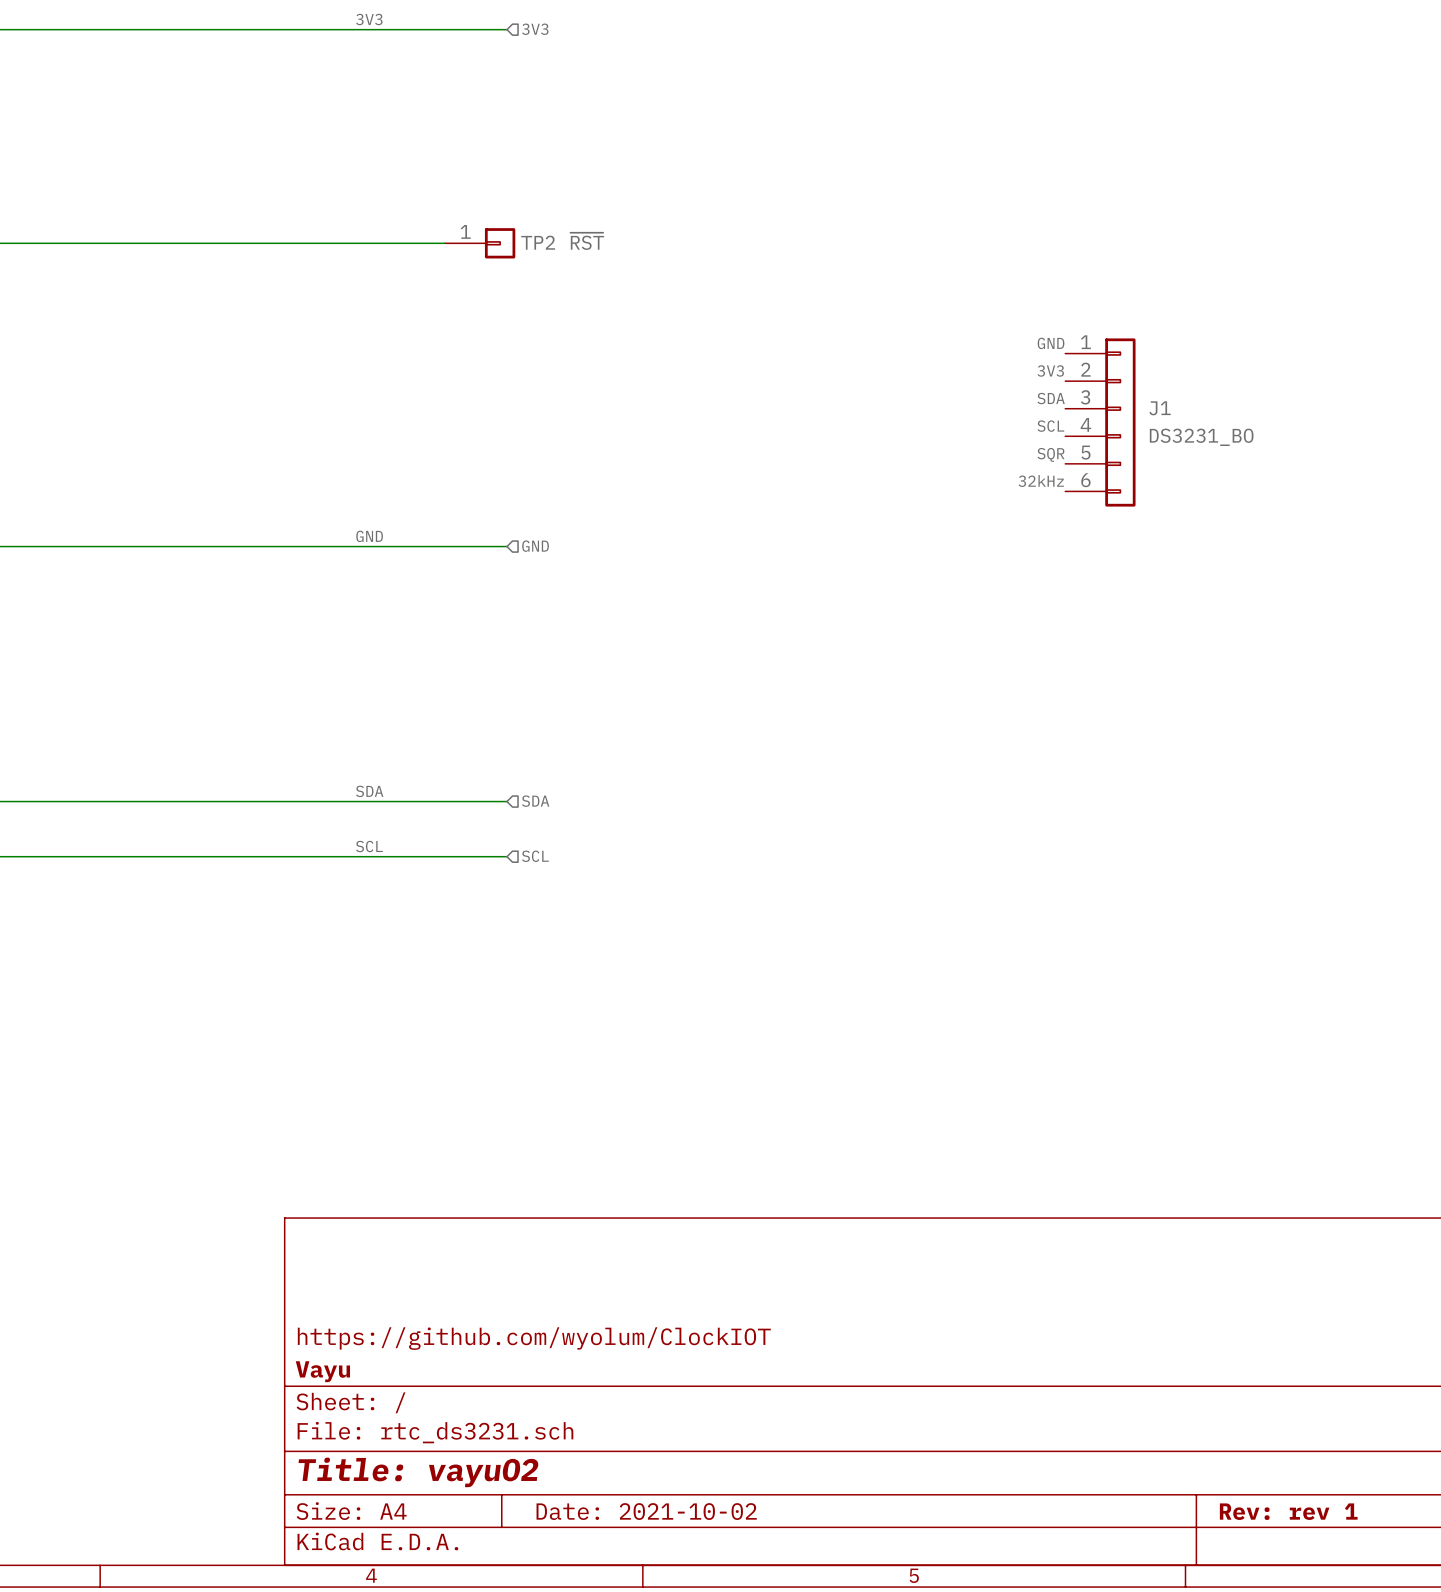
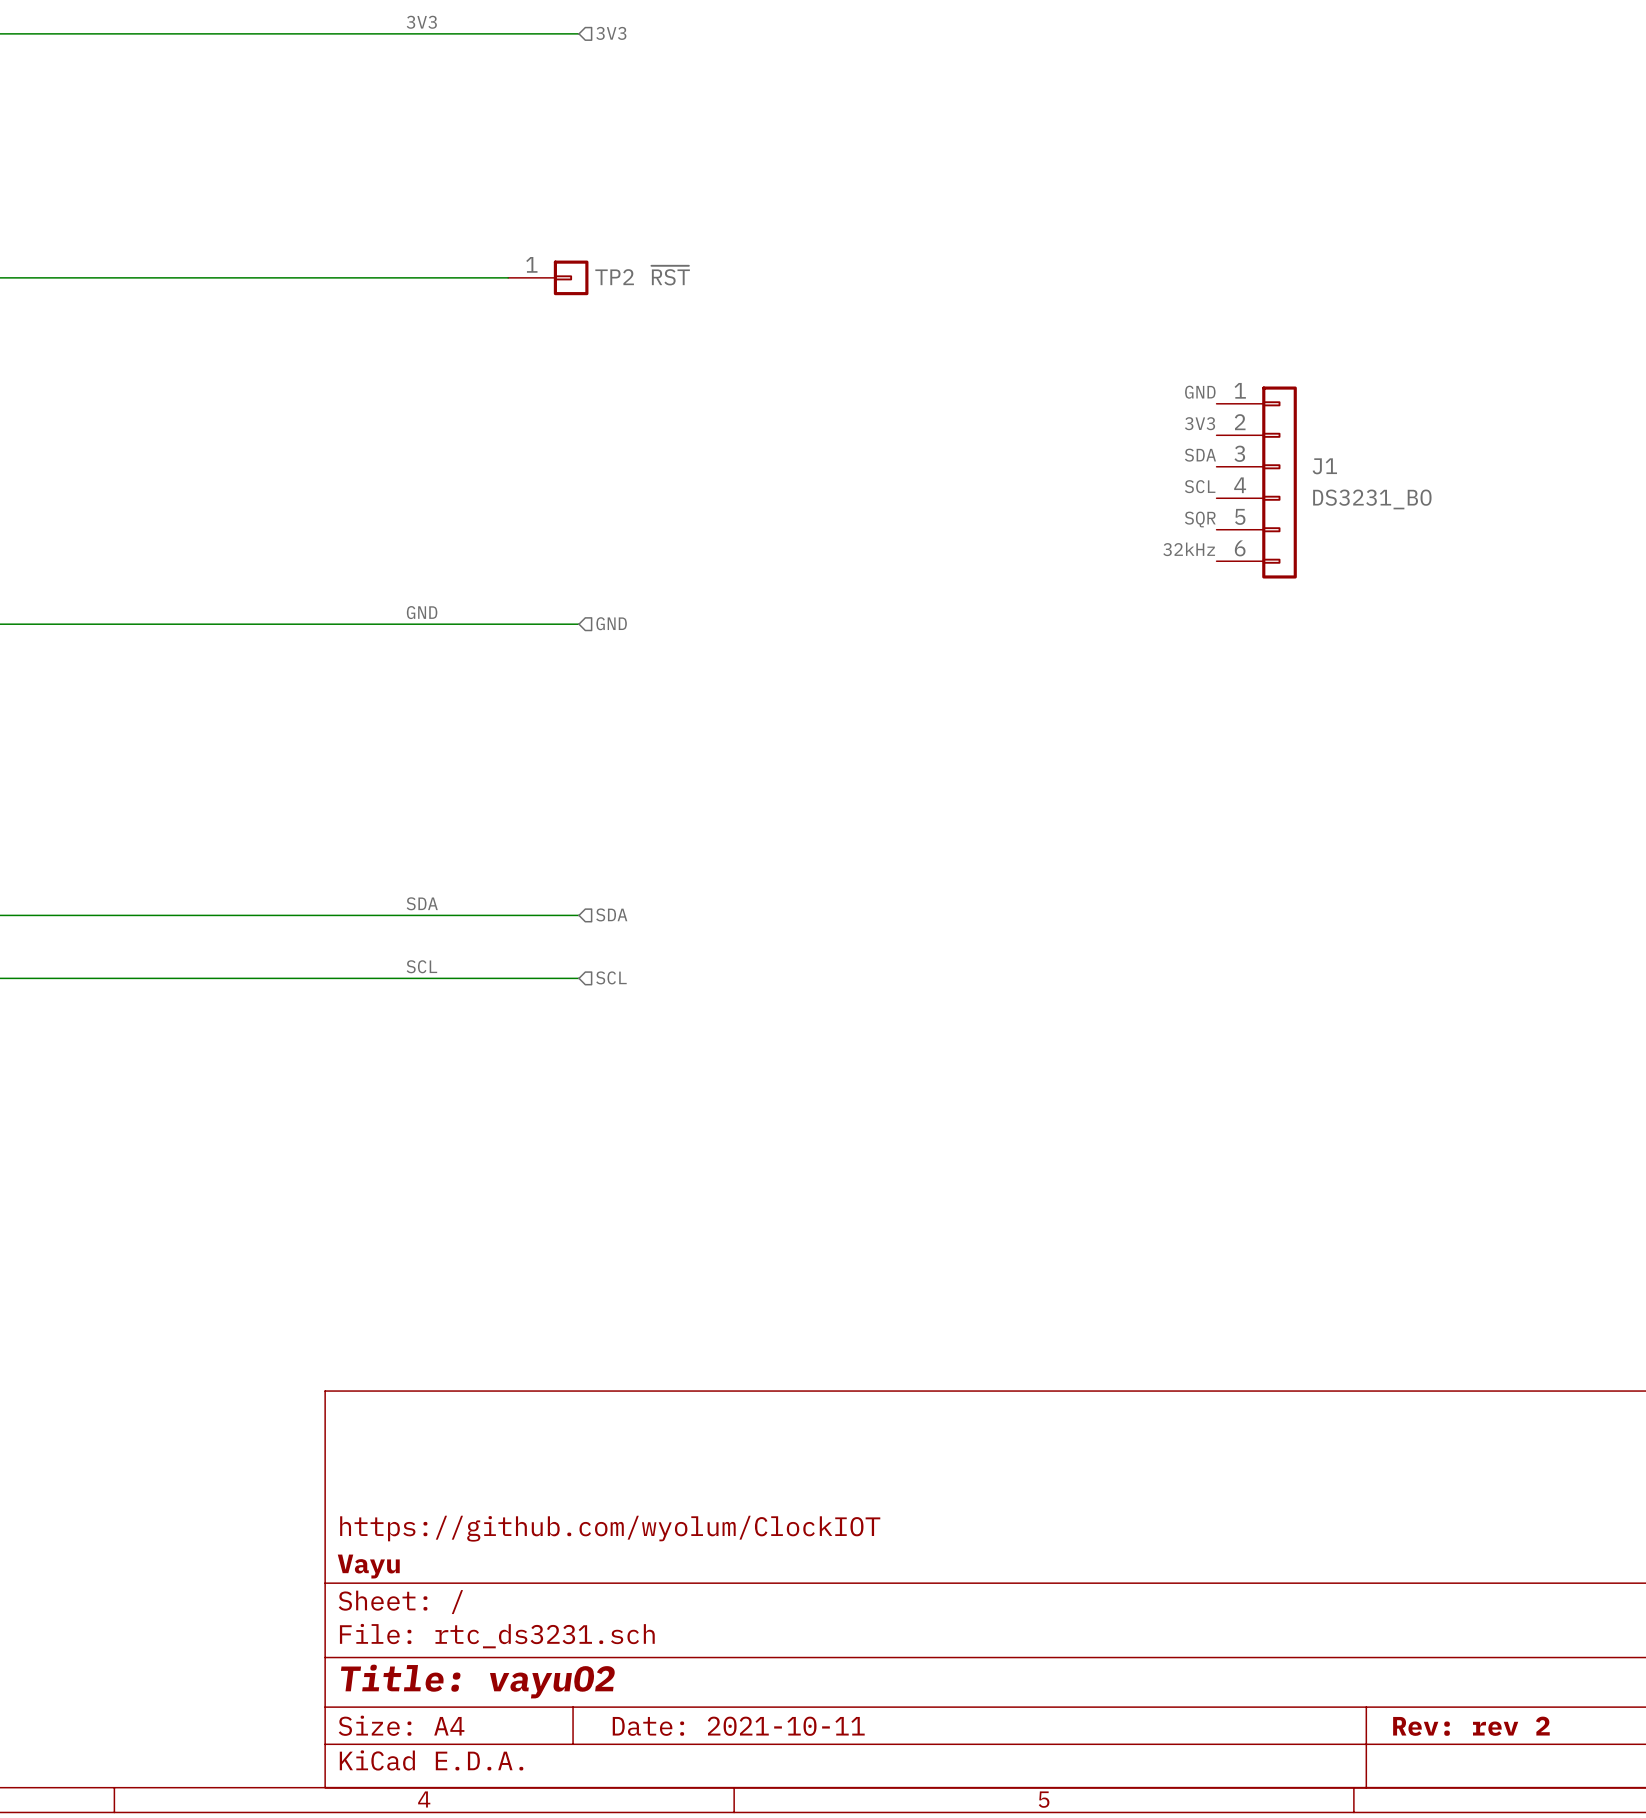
title block: Date: 2021-10-02 (646, 1511) -> Date: 2021-10-11 (738, 1726)
title block: Rev: rev 1 (1288, 1511) -> Rev: rev 2 (1471, 1726)

